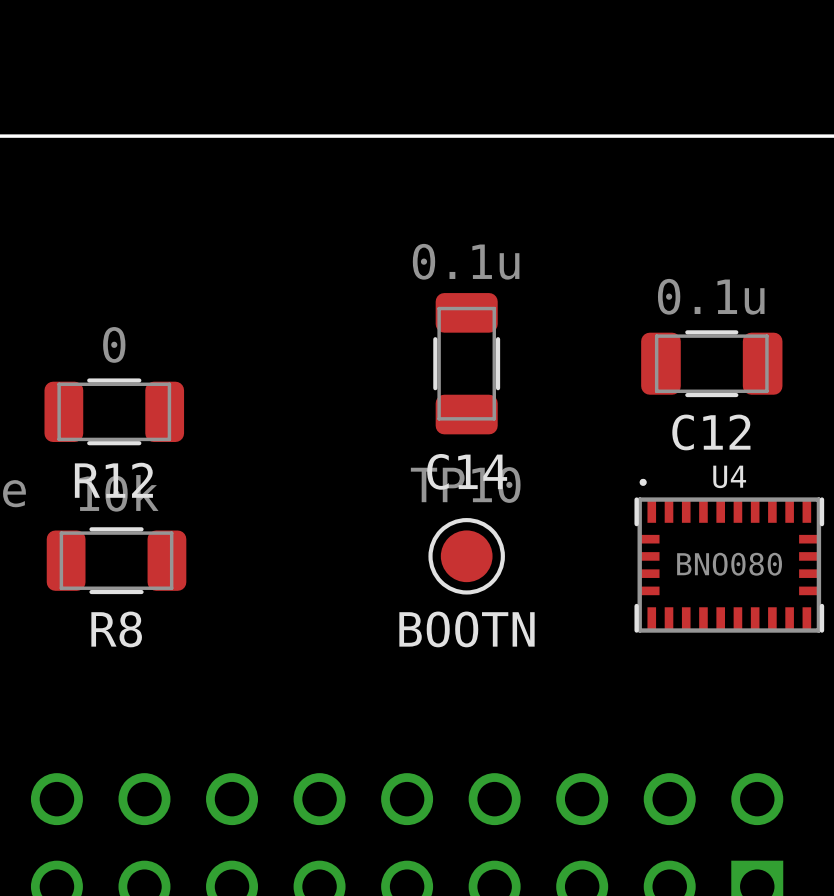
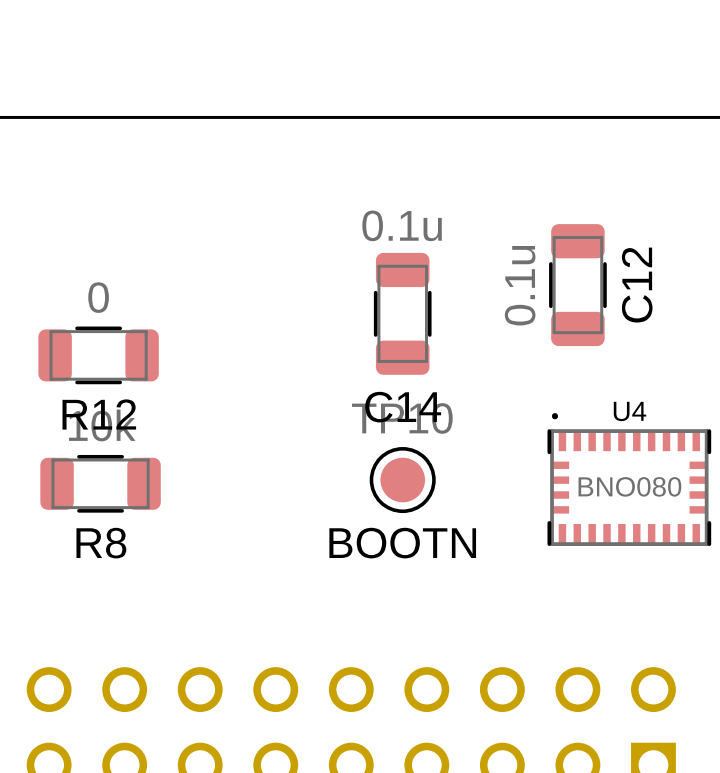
C12 value position: 0.1u (711, 296) -> 0.1u (520, 285)
C12 rotation: 0° (711, 363) -> 90° clockwise (577, 285)
C12 name position: C12 (711, 432) -> C12 (637, 285)

